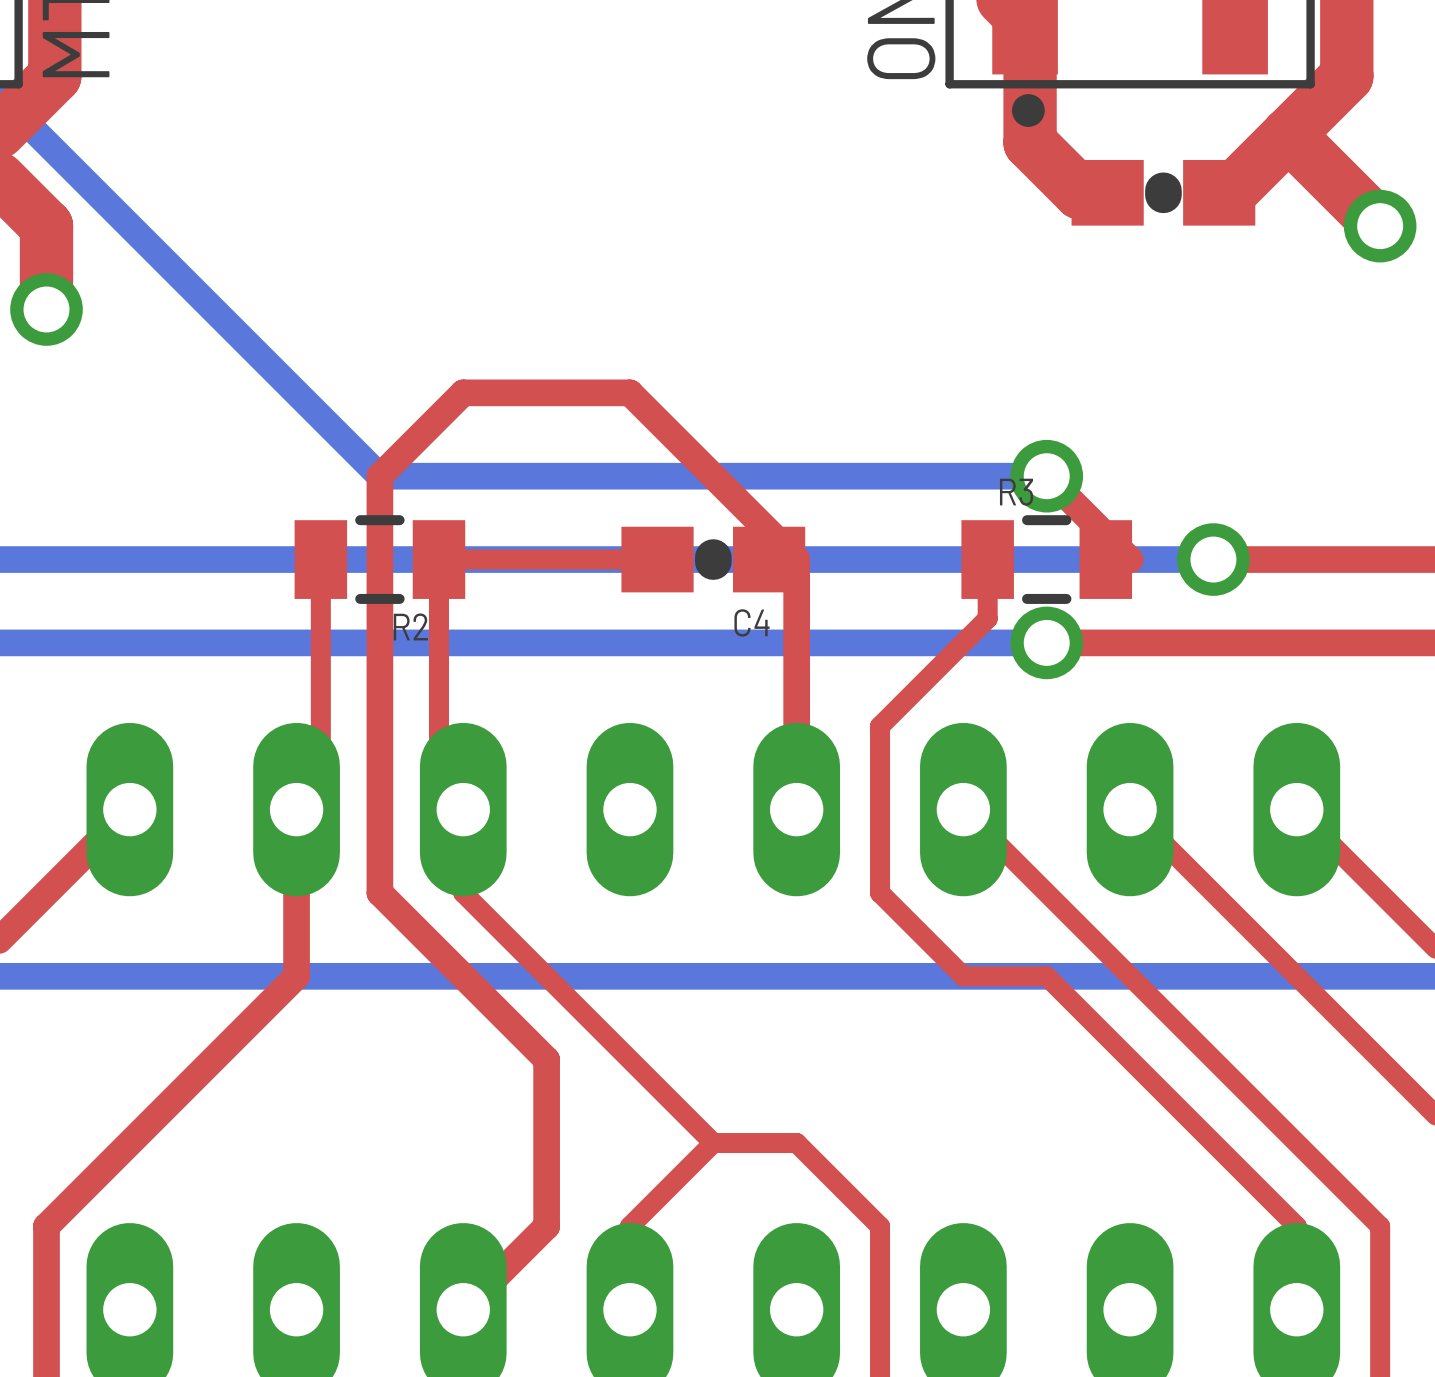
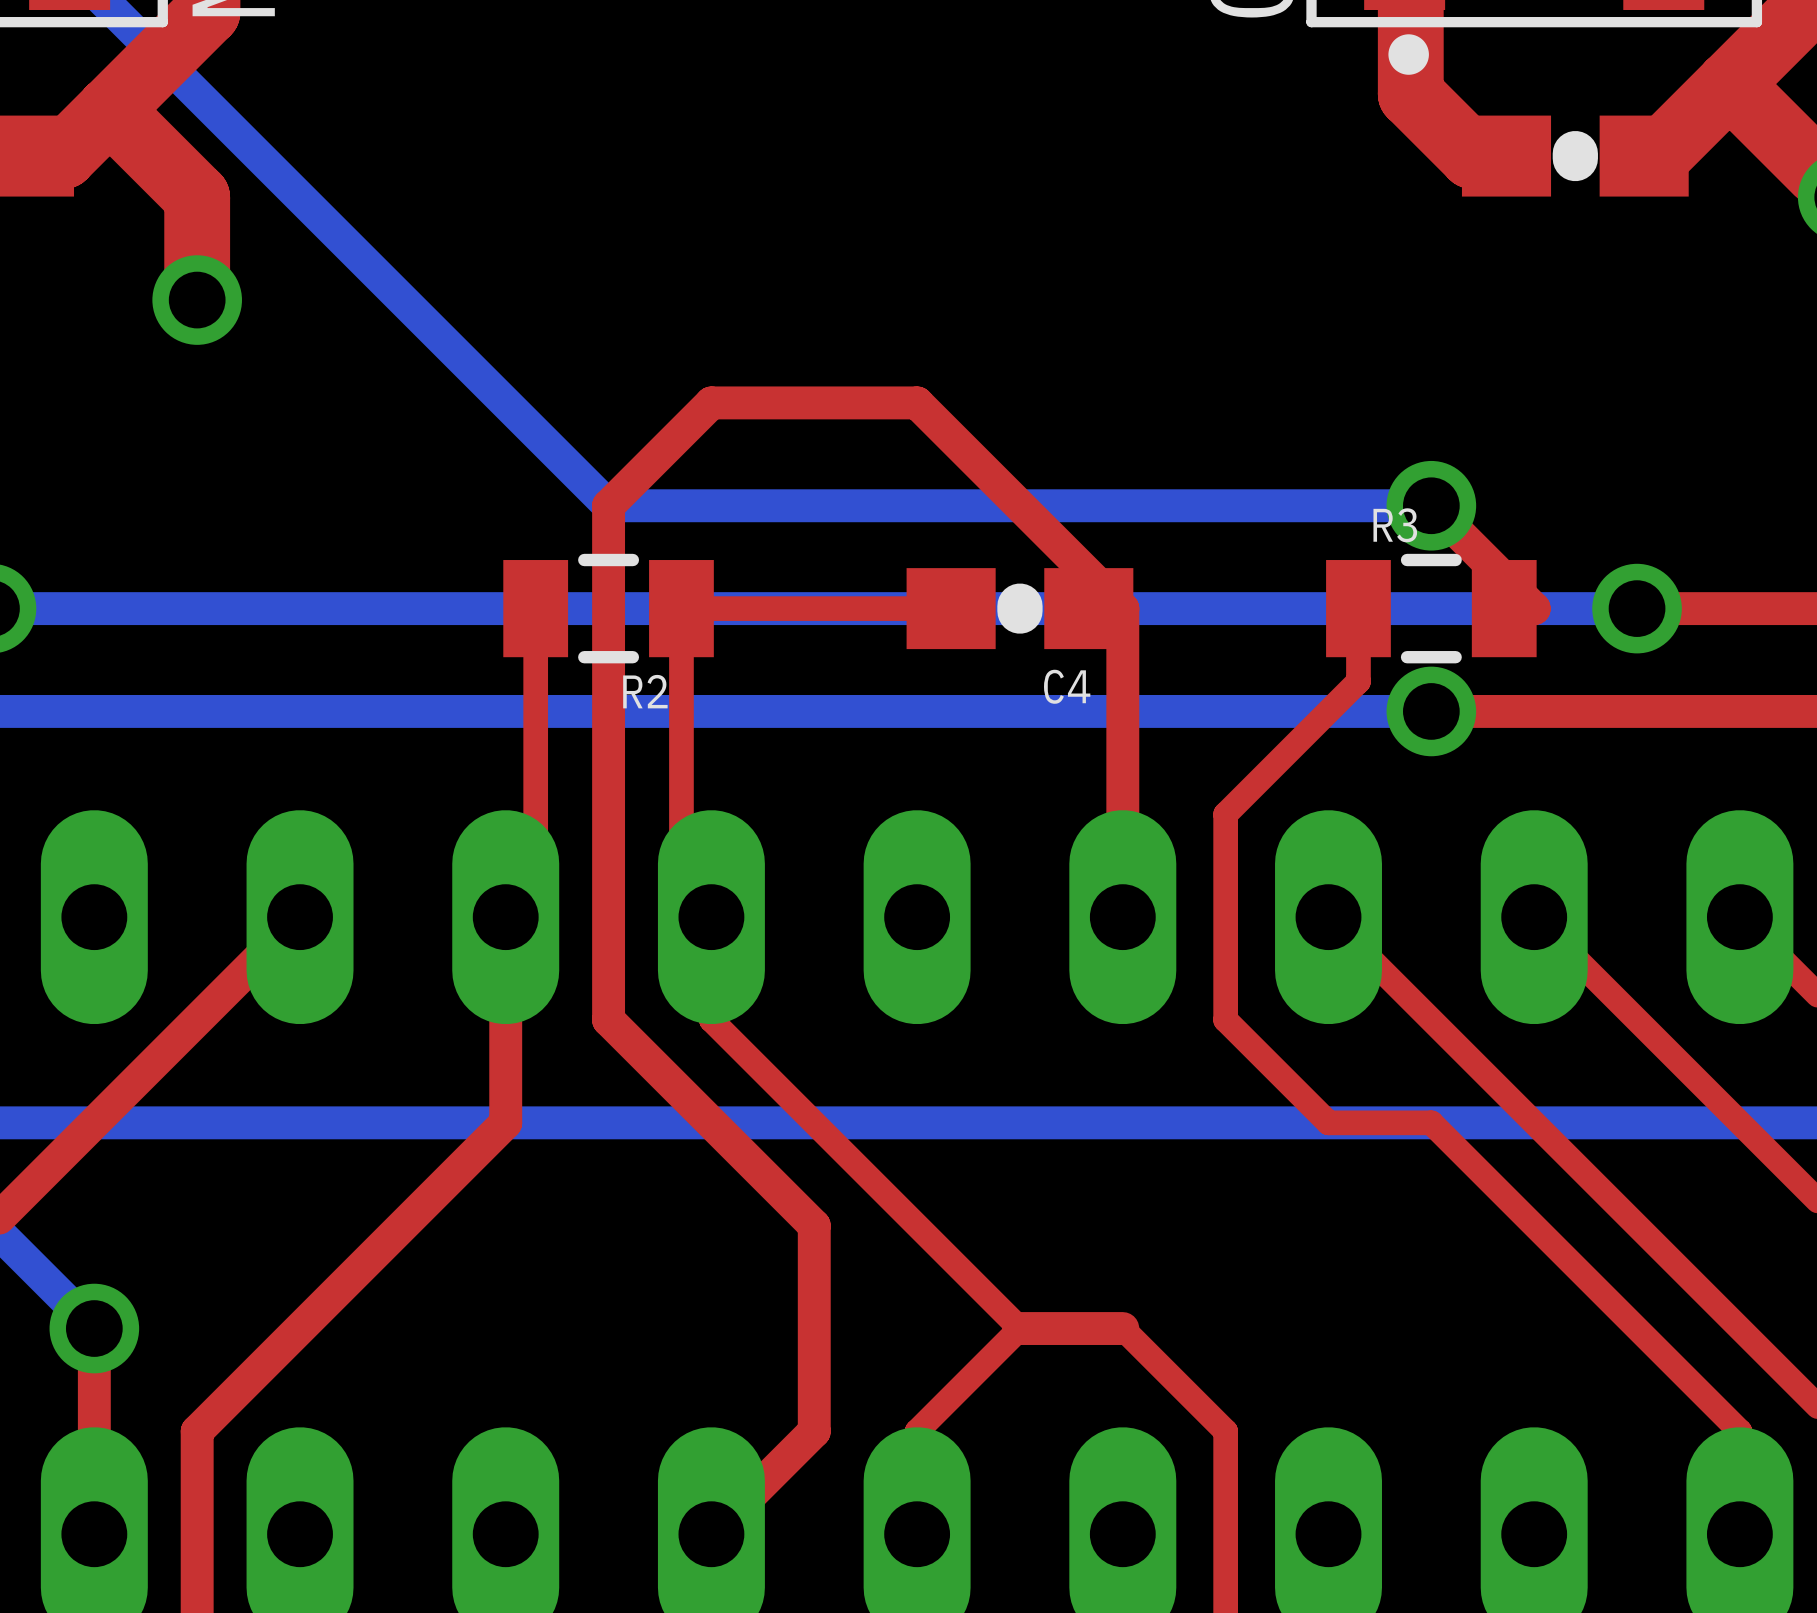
top track width: thin (713, 1143) (796, 1143) -> thick (1019, 1328) (1122, 1328)

